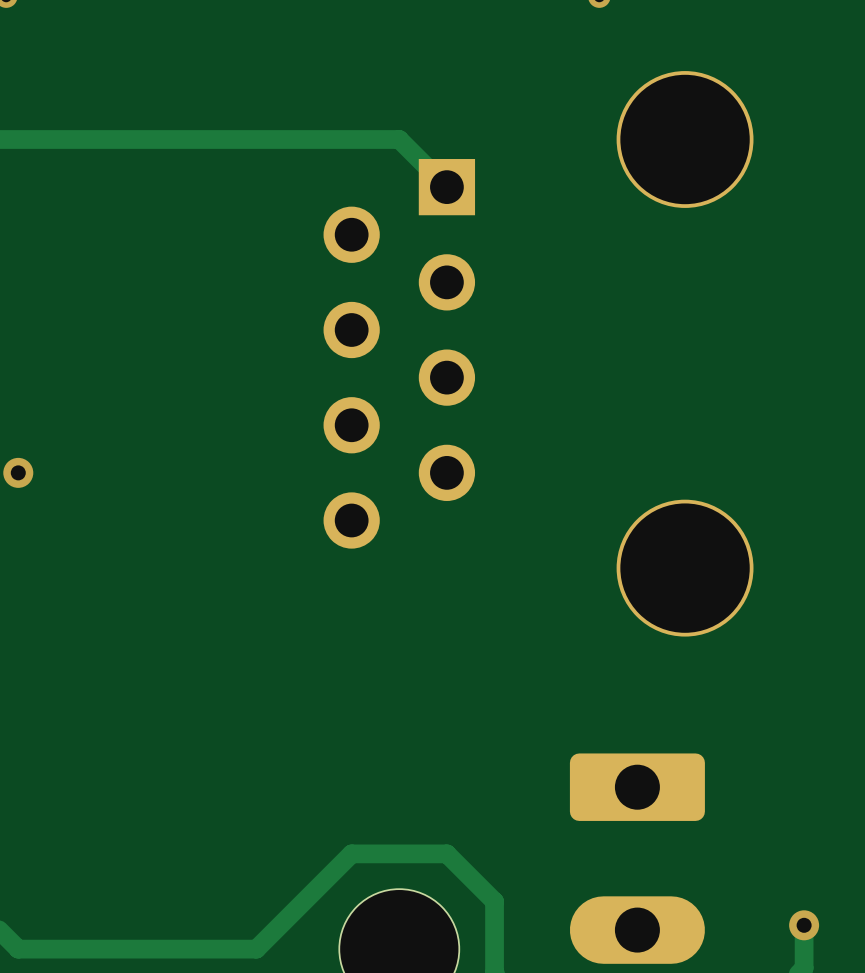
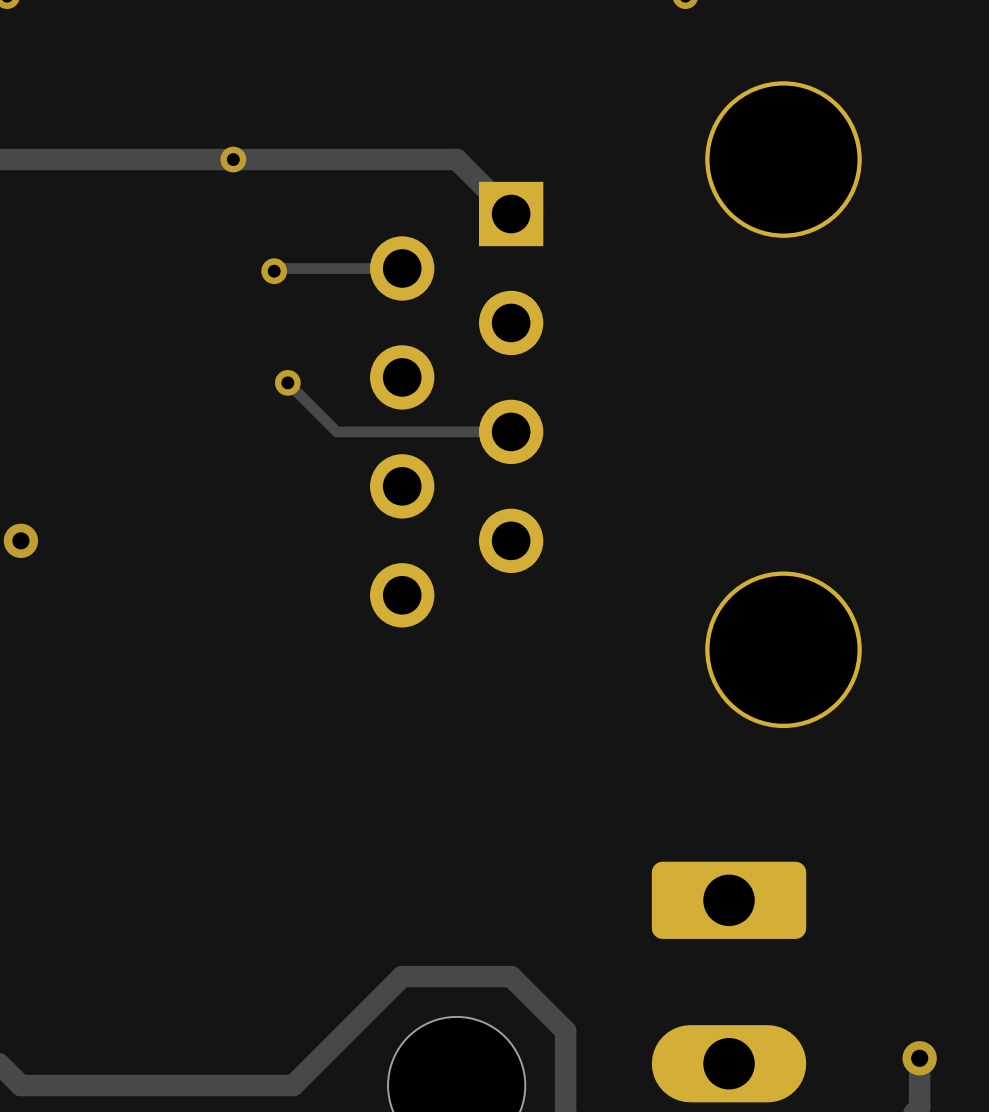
via: none -> (233, 159)
track: none -> (402, 268) (276, 268) (274, 271)
via: none -> (274, 271)
track: none -> (287, 382) (336, 431) (511, 431)
via: none -> (287, 382)

